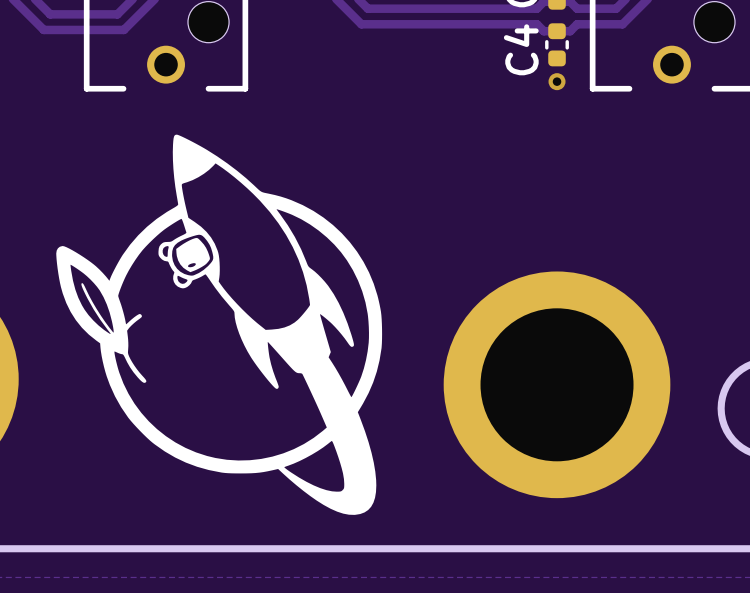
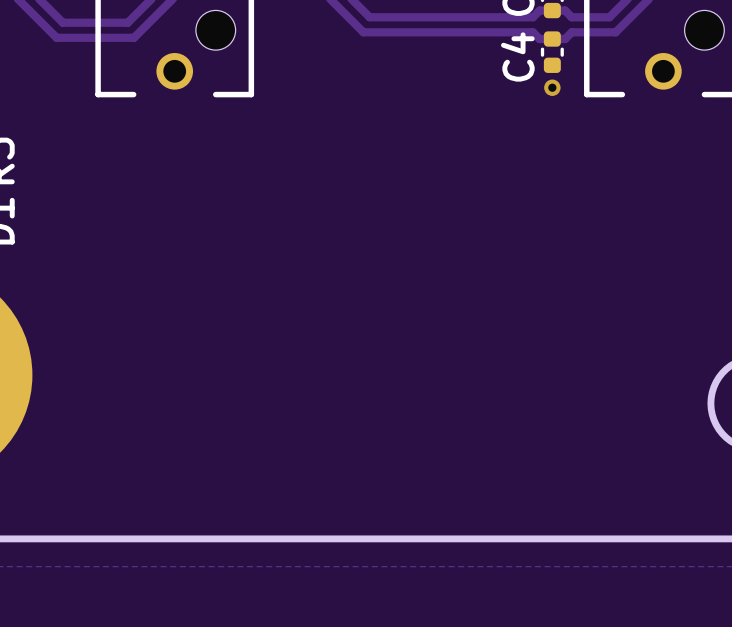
drawing: [56, 134, 383, 515] -> none
part: (557, 384) -> none

